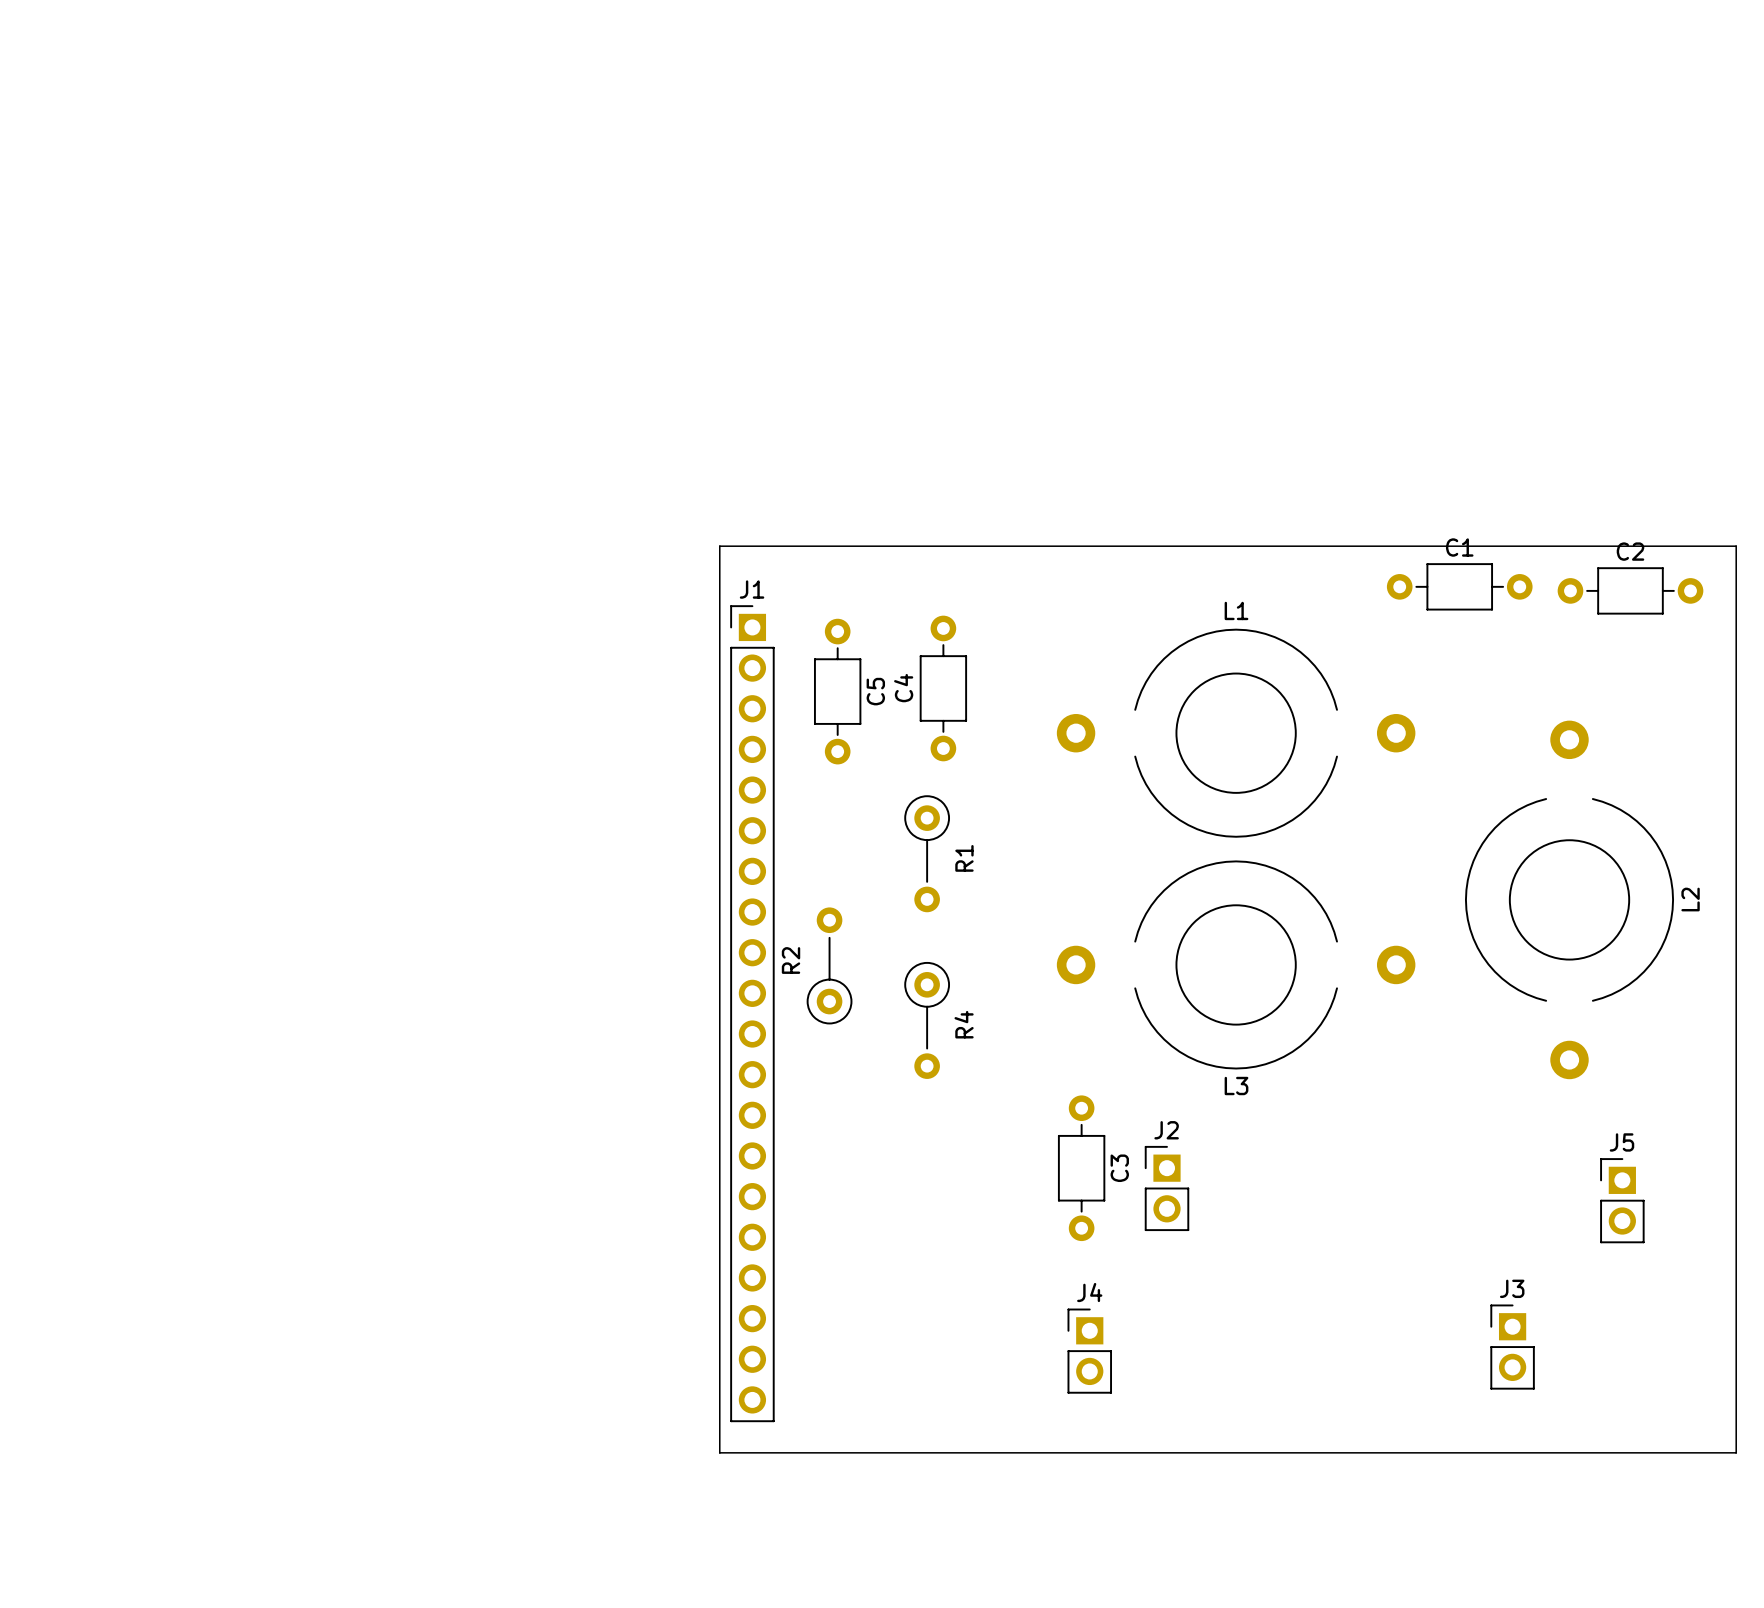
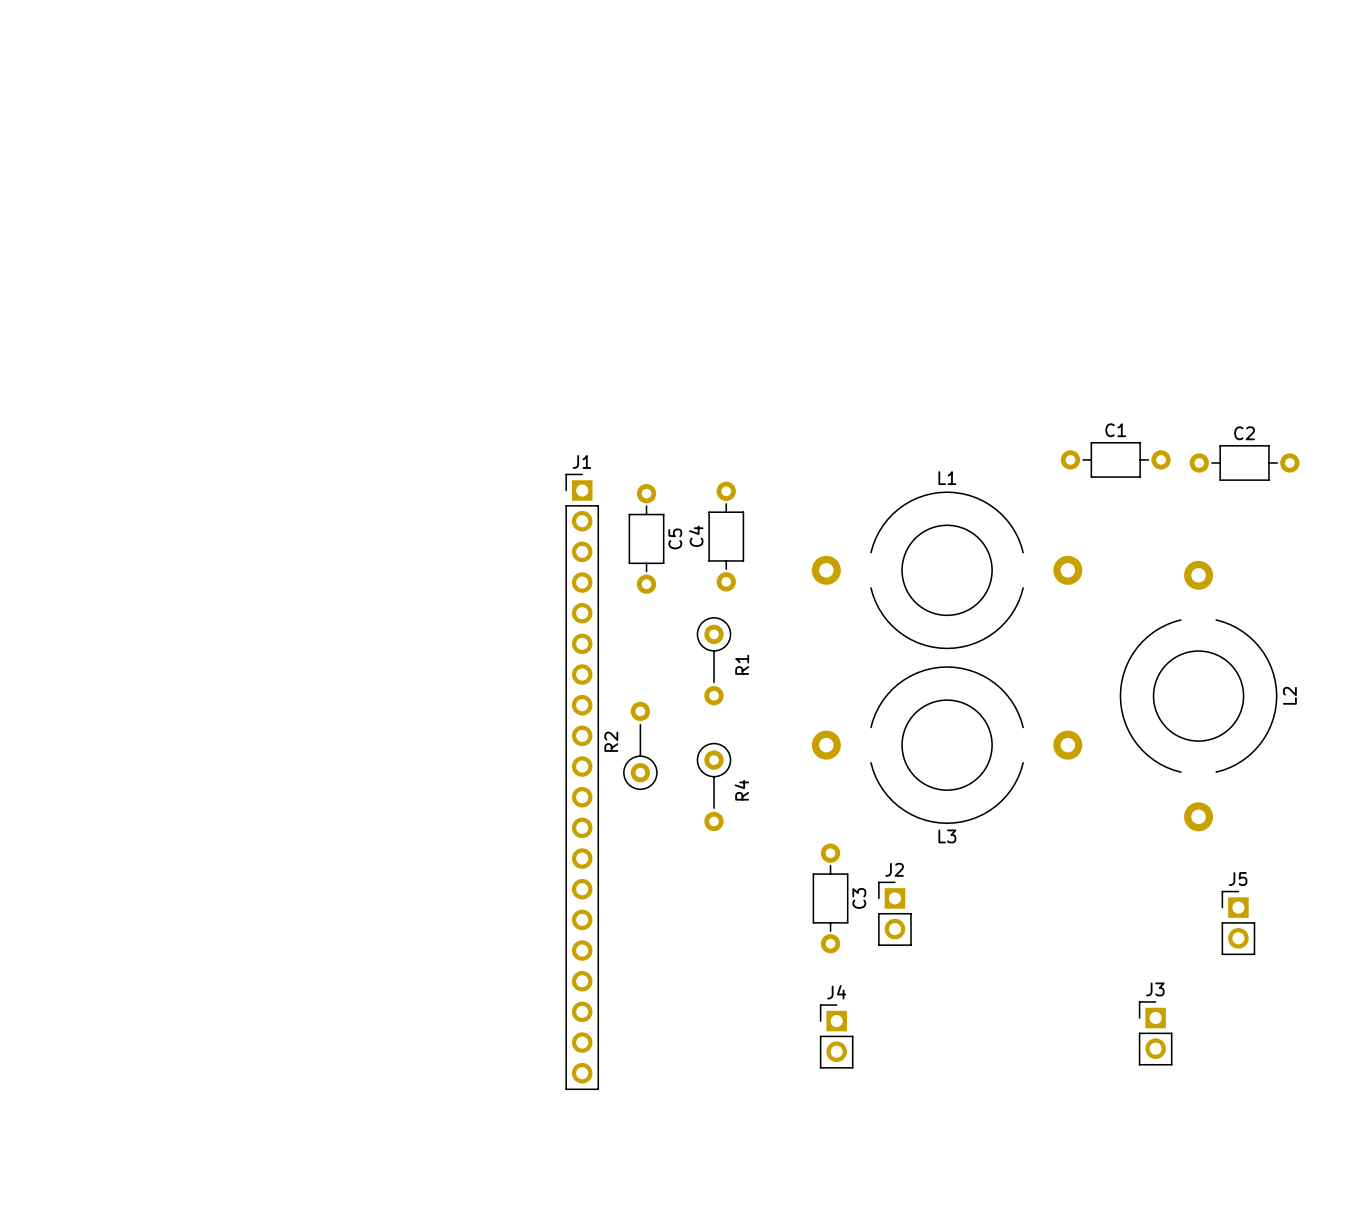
board edge: (719, 546) (1736, 546) (1736, 1452) (719, 1452) (719, 546) -> none

